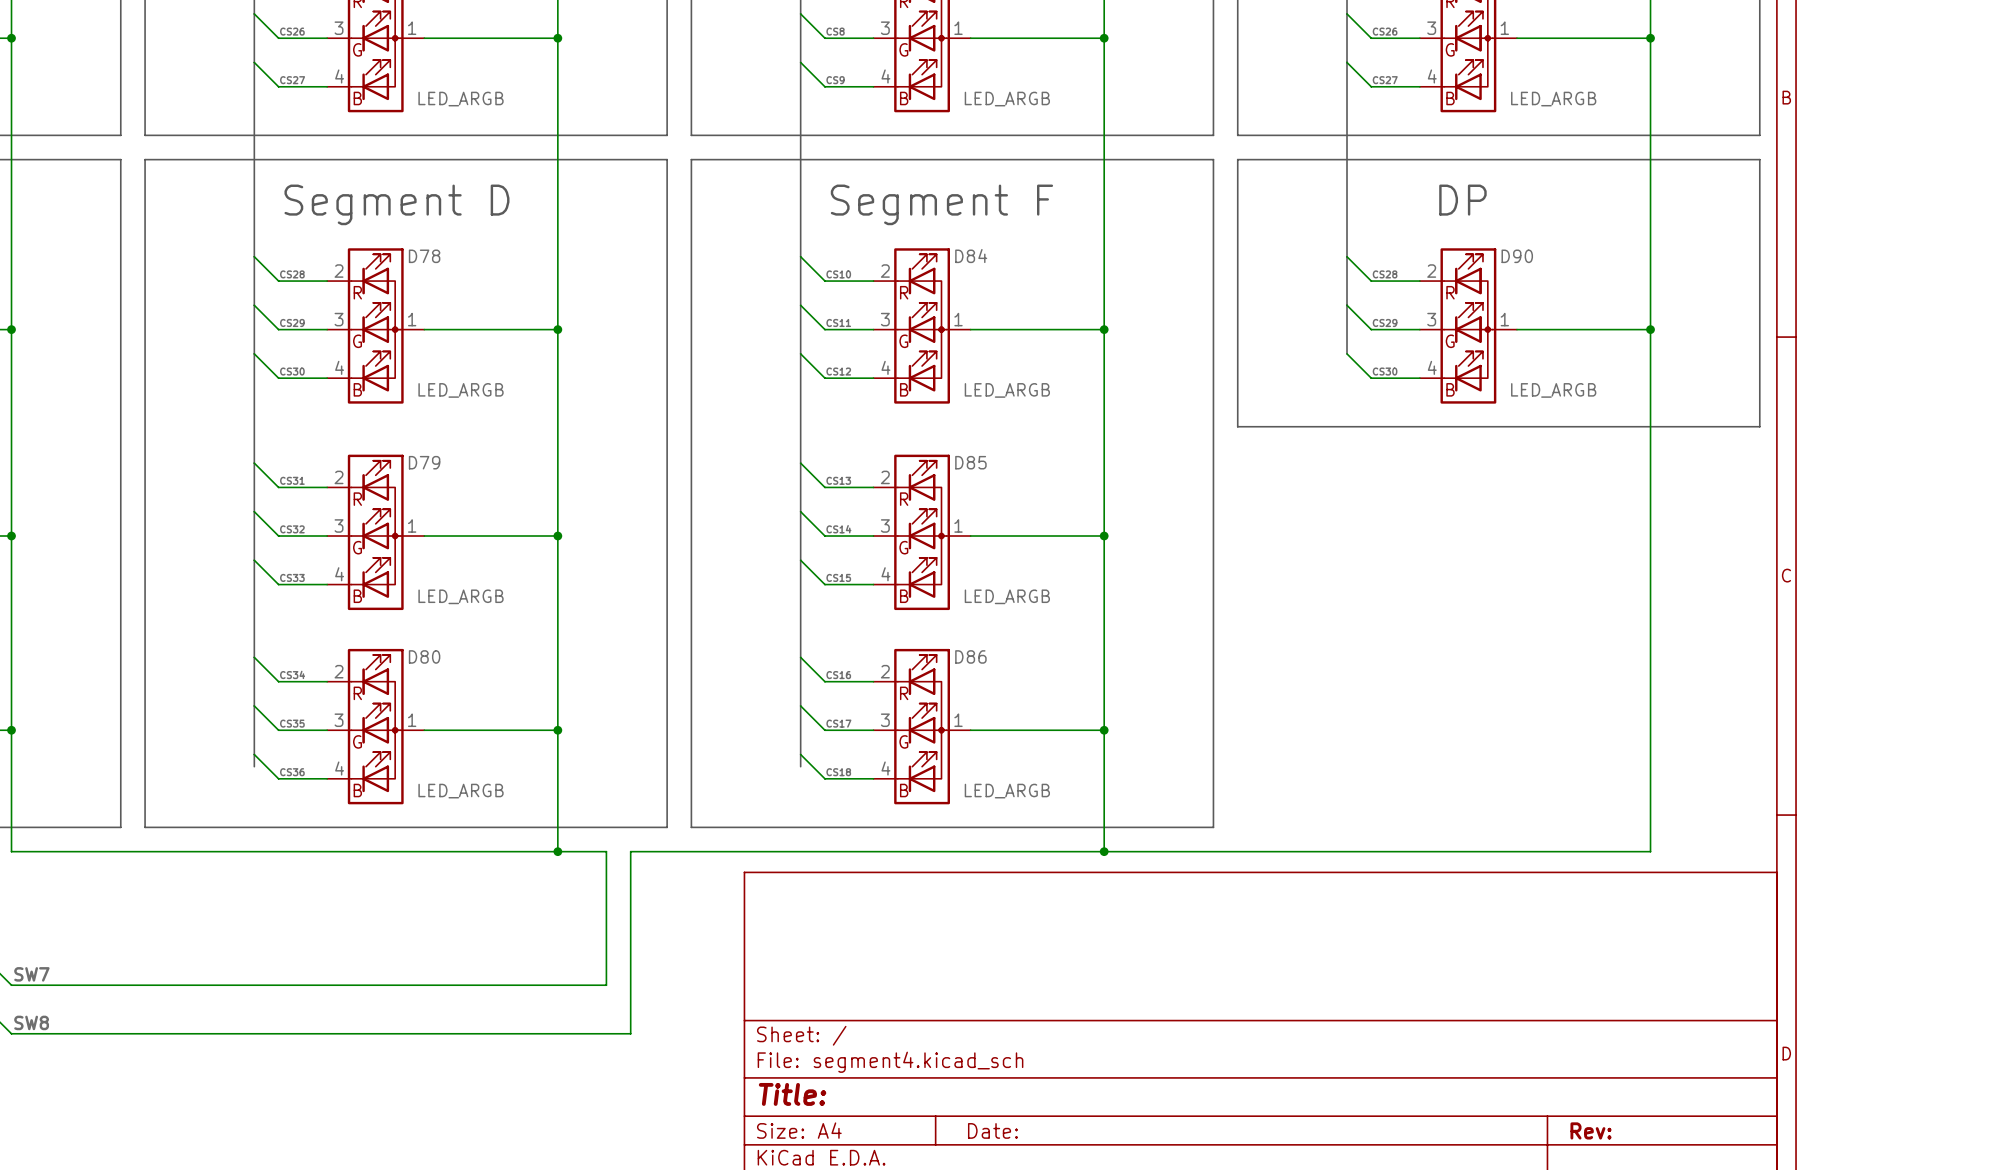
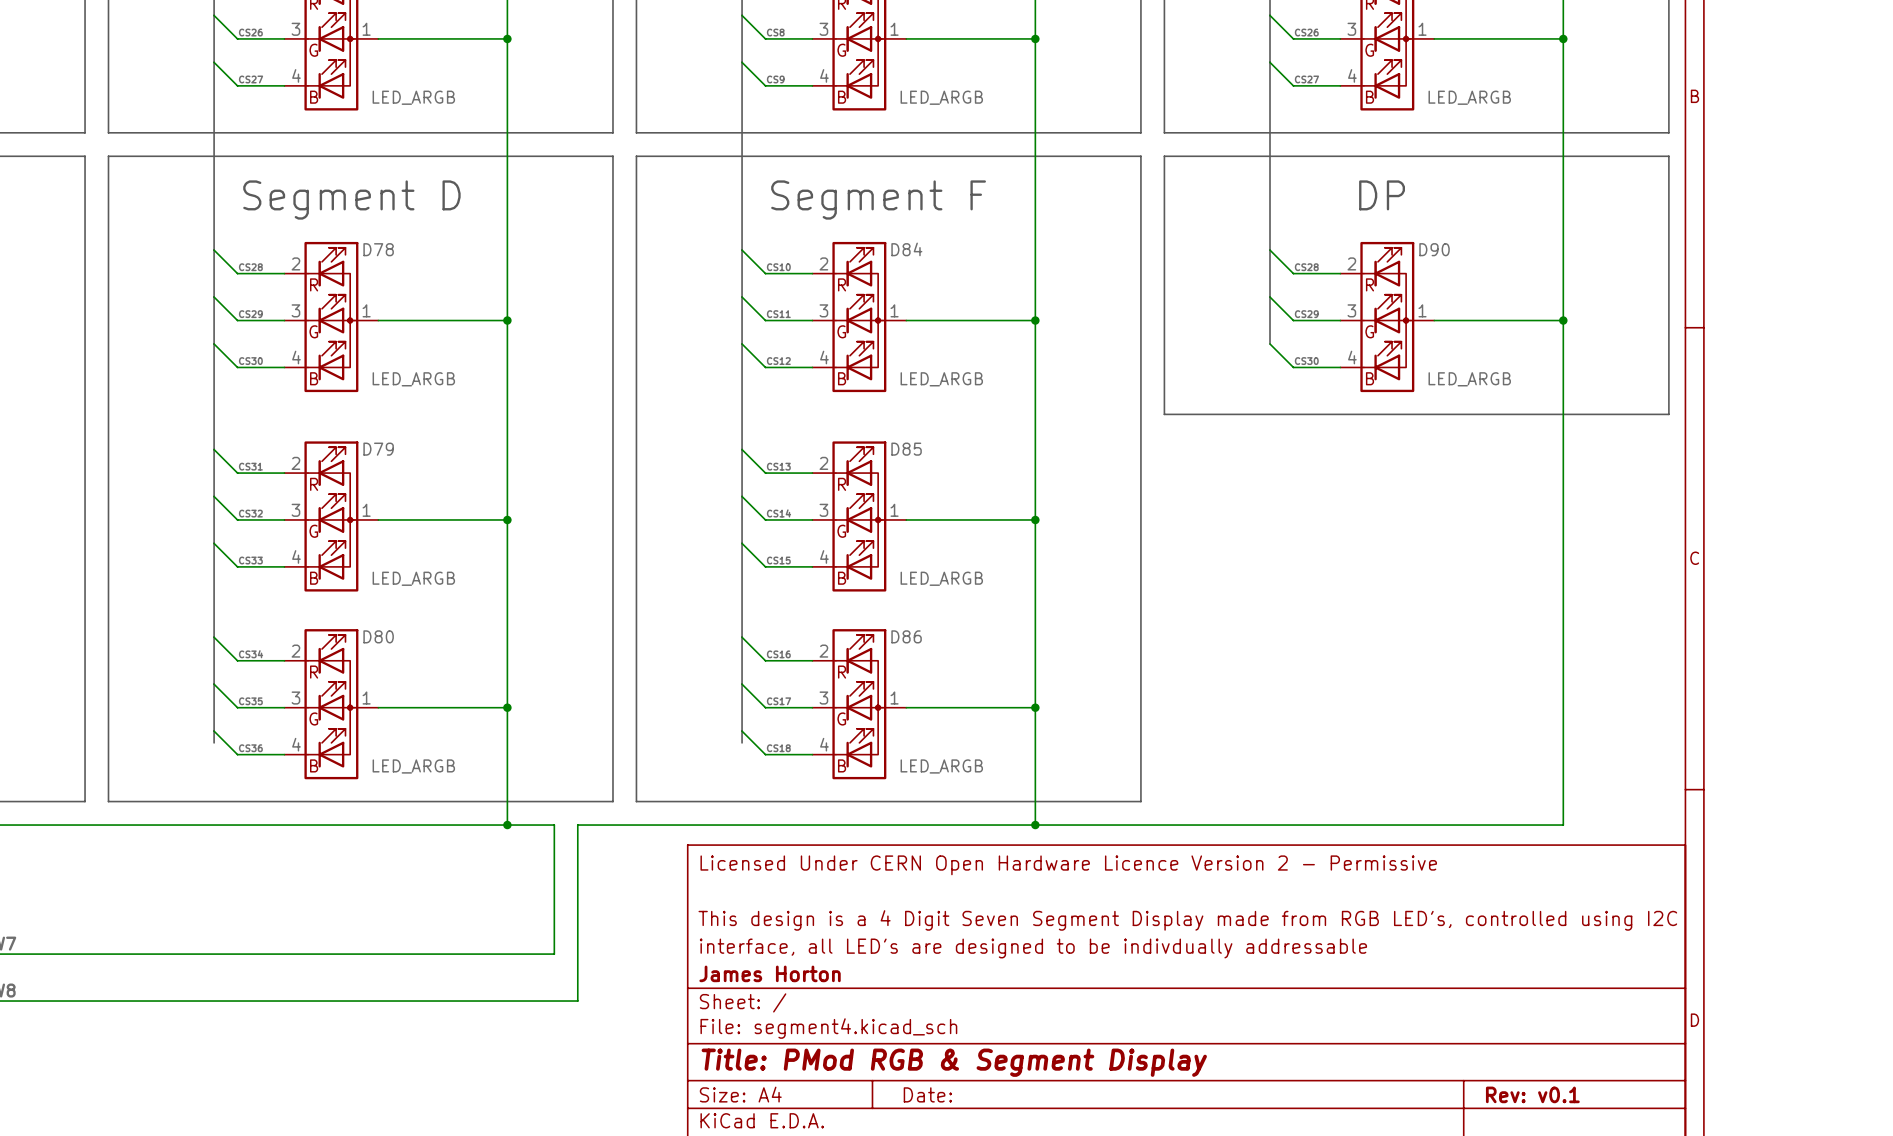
title block: none -> Licensed Under CERN Open Hardware Licence Version 2 - Permissive (1068, 865)
title block: none -> This design is a 4 Digit Seven Segment Display made from RGB LED's, controlled using I2C (1187, 920)
title block: none -> interface, all LED's are designed to be indivdually addressable (1033, 948)
title block: none -> James Horton (770, 973)
title block: Title: (792, 1094) -> Title: PMod RGB & Segment Display (954, 1062)
title block: Rev: (1591, 1130) -> Rev: v0.1 (1532, 1094)

